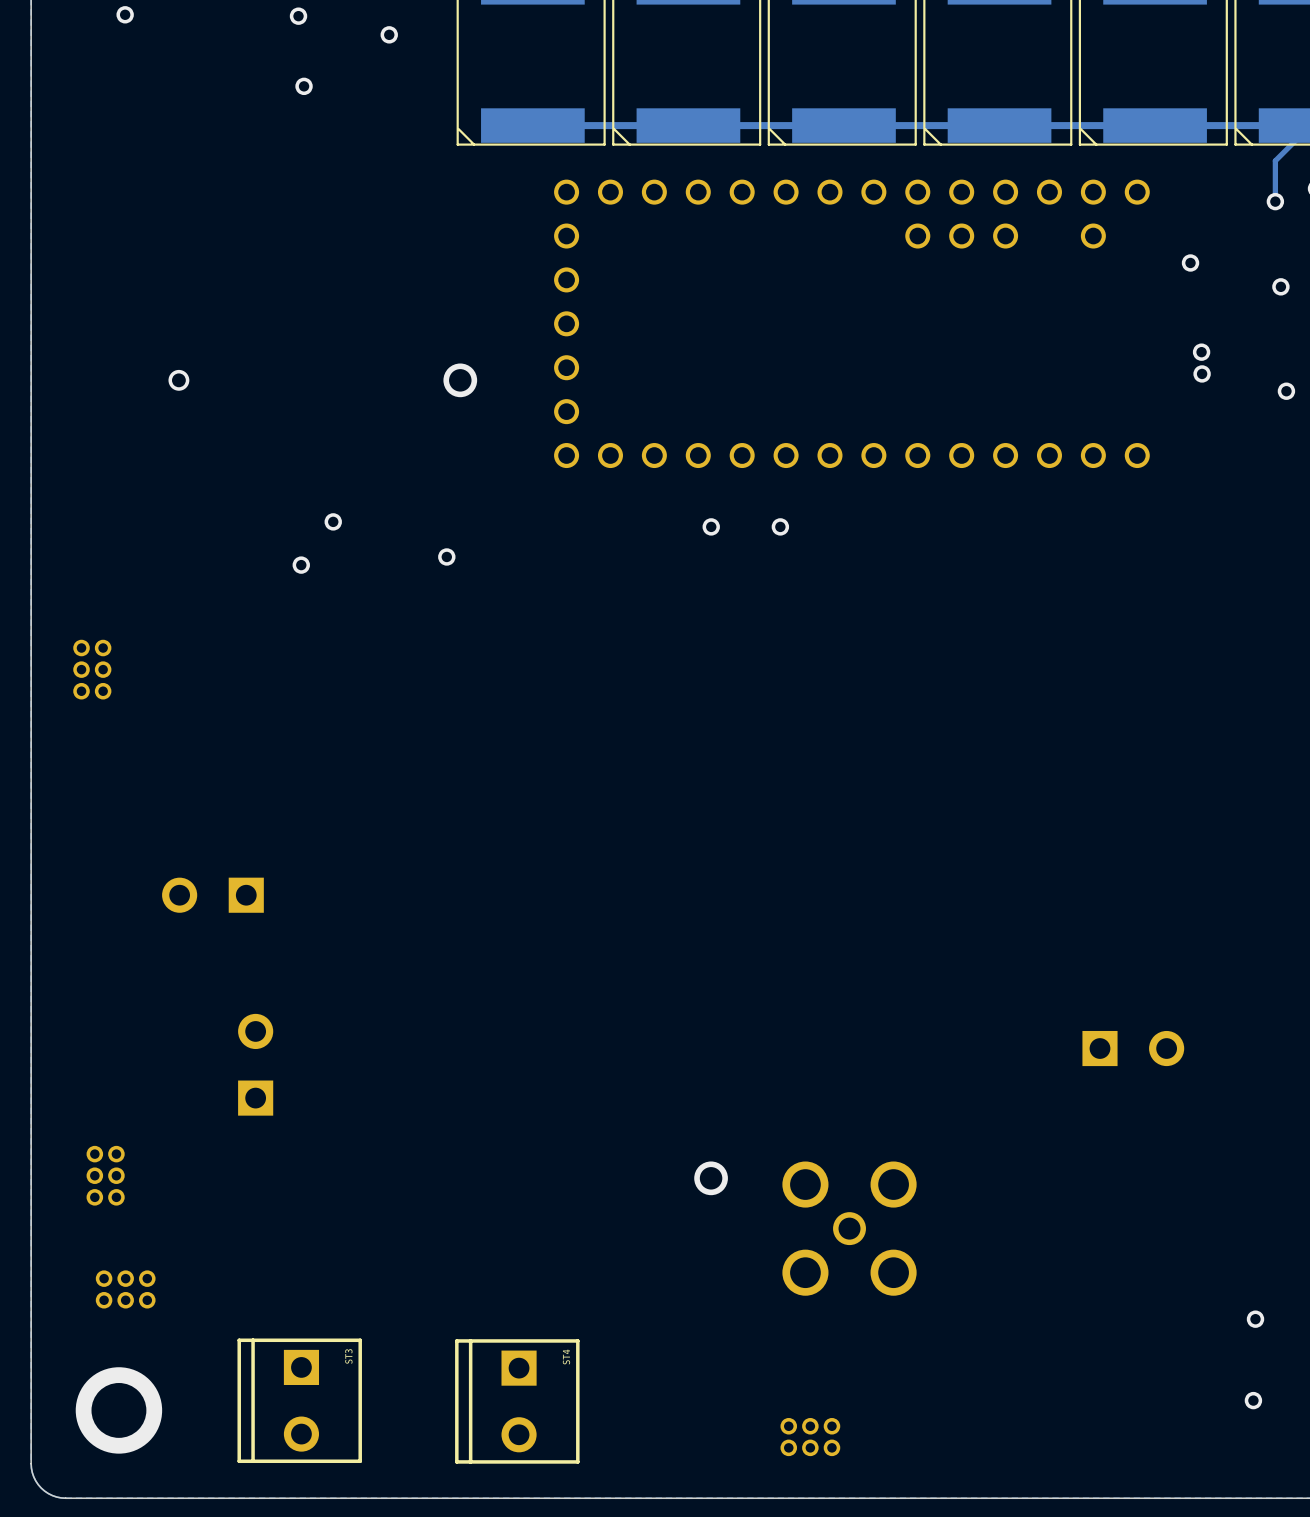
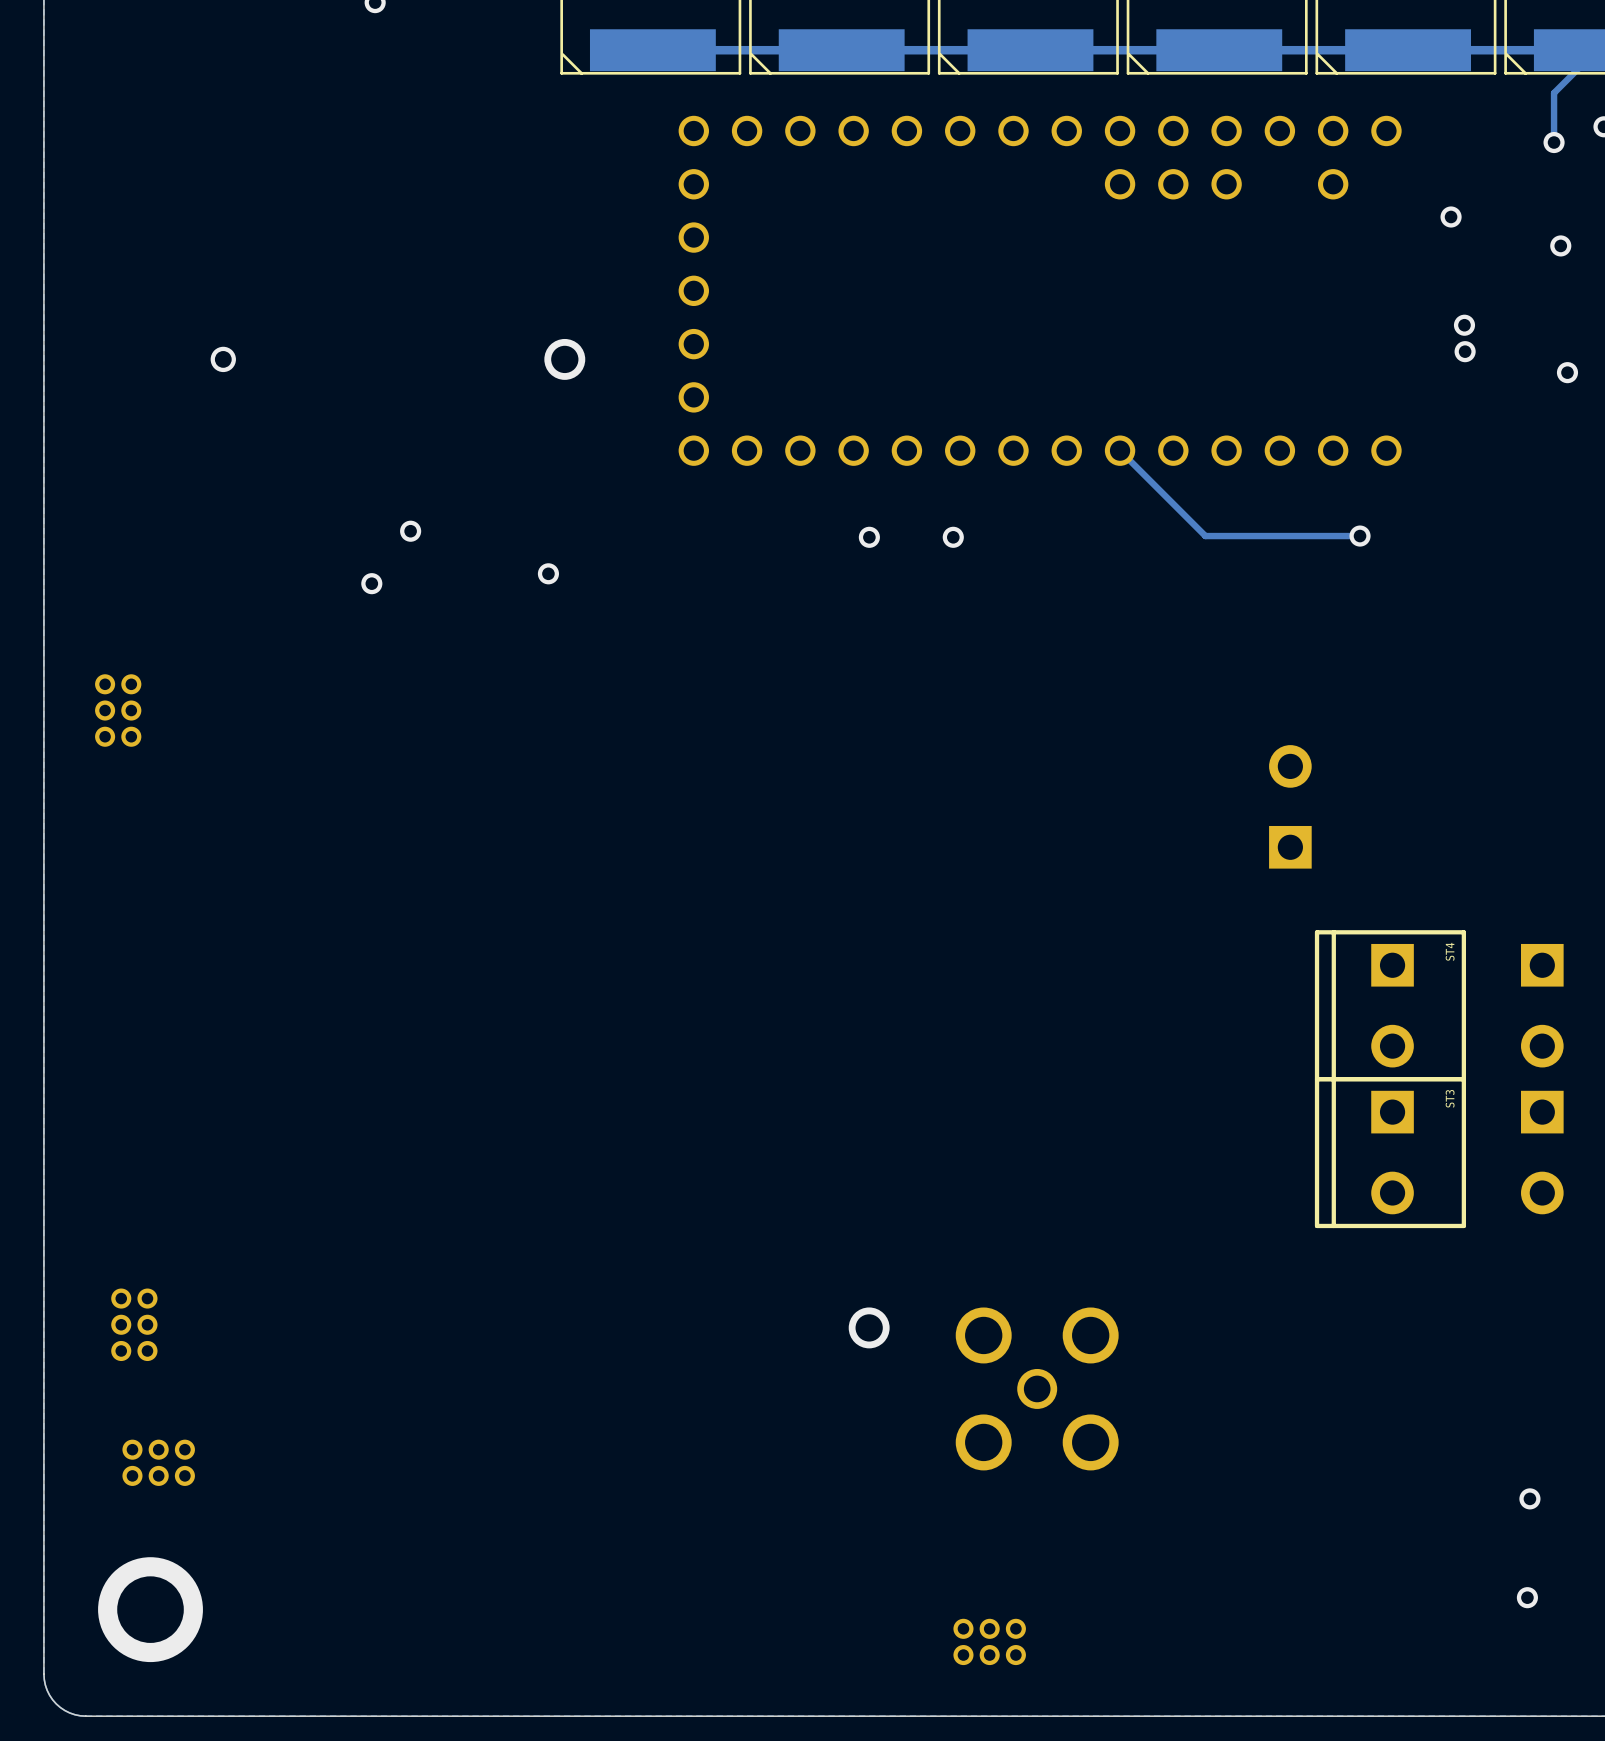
track: none -> (1120, 450) (1205, 536) (1360, 536)
via: none -> (1360, 536)
part: none -> (1290, 806)
part: (212, 895) -> none
part: none -> (1542, 1005)
part: none -> (1542, 1152)
part: (1133, 1048) -> none
part: (255, 1064) -> none
ST3 position: (299, 1400) -> (1390, 1152)
ST4 position: (517, 1401) -> (1390, 1005)

